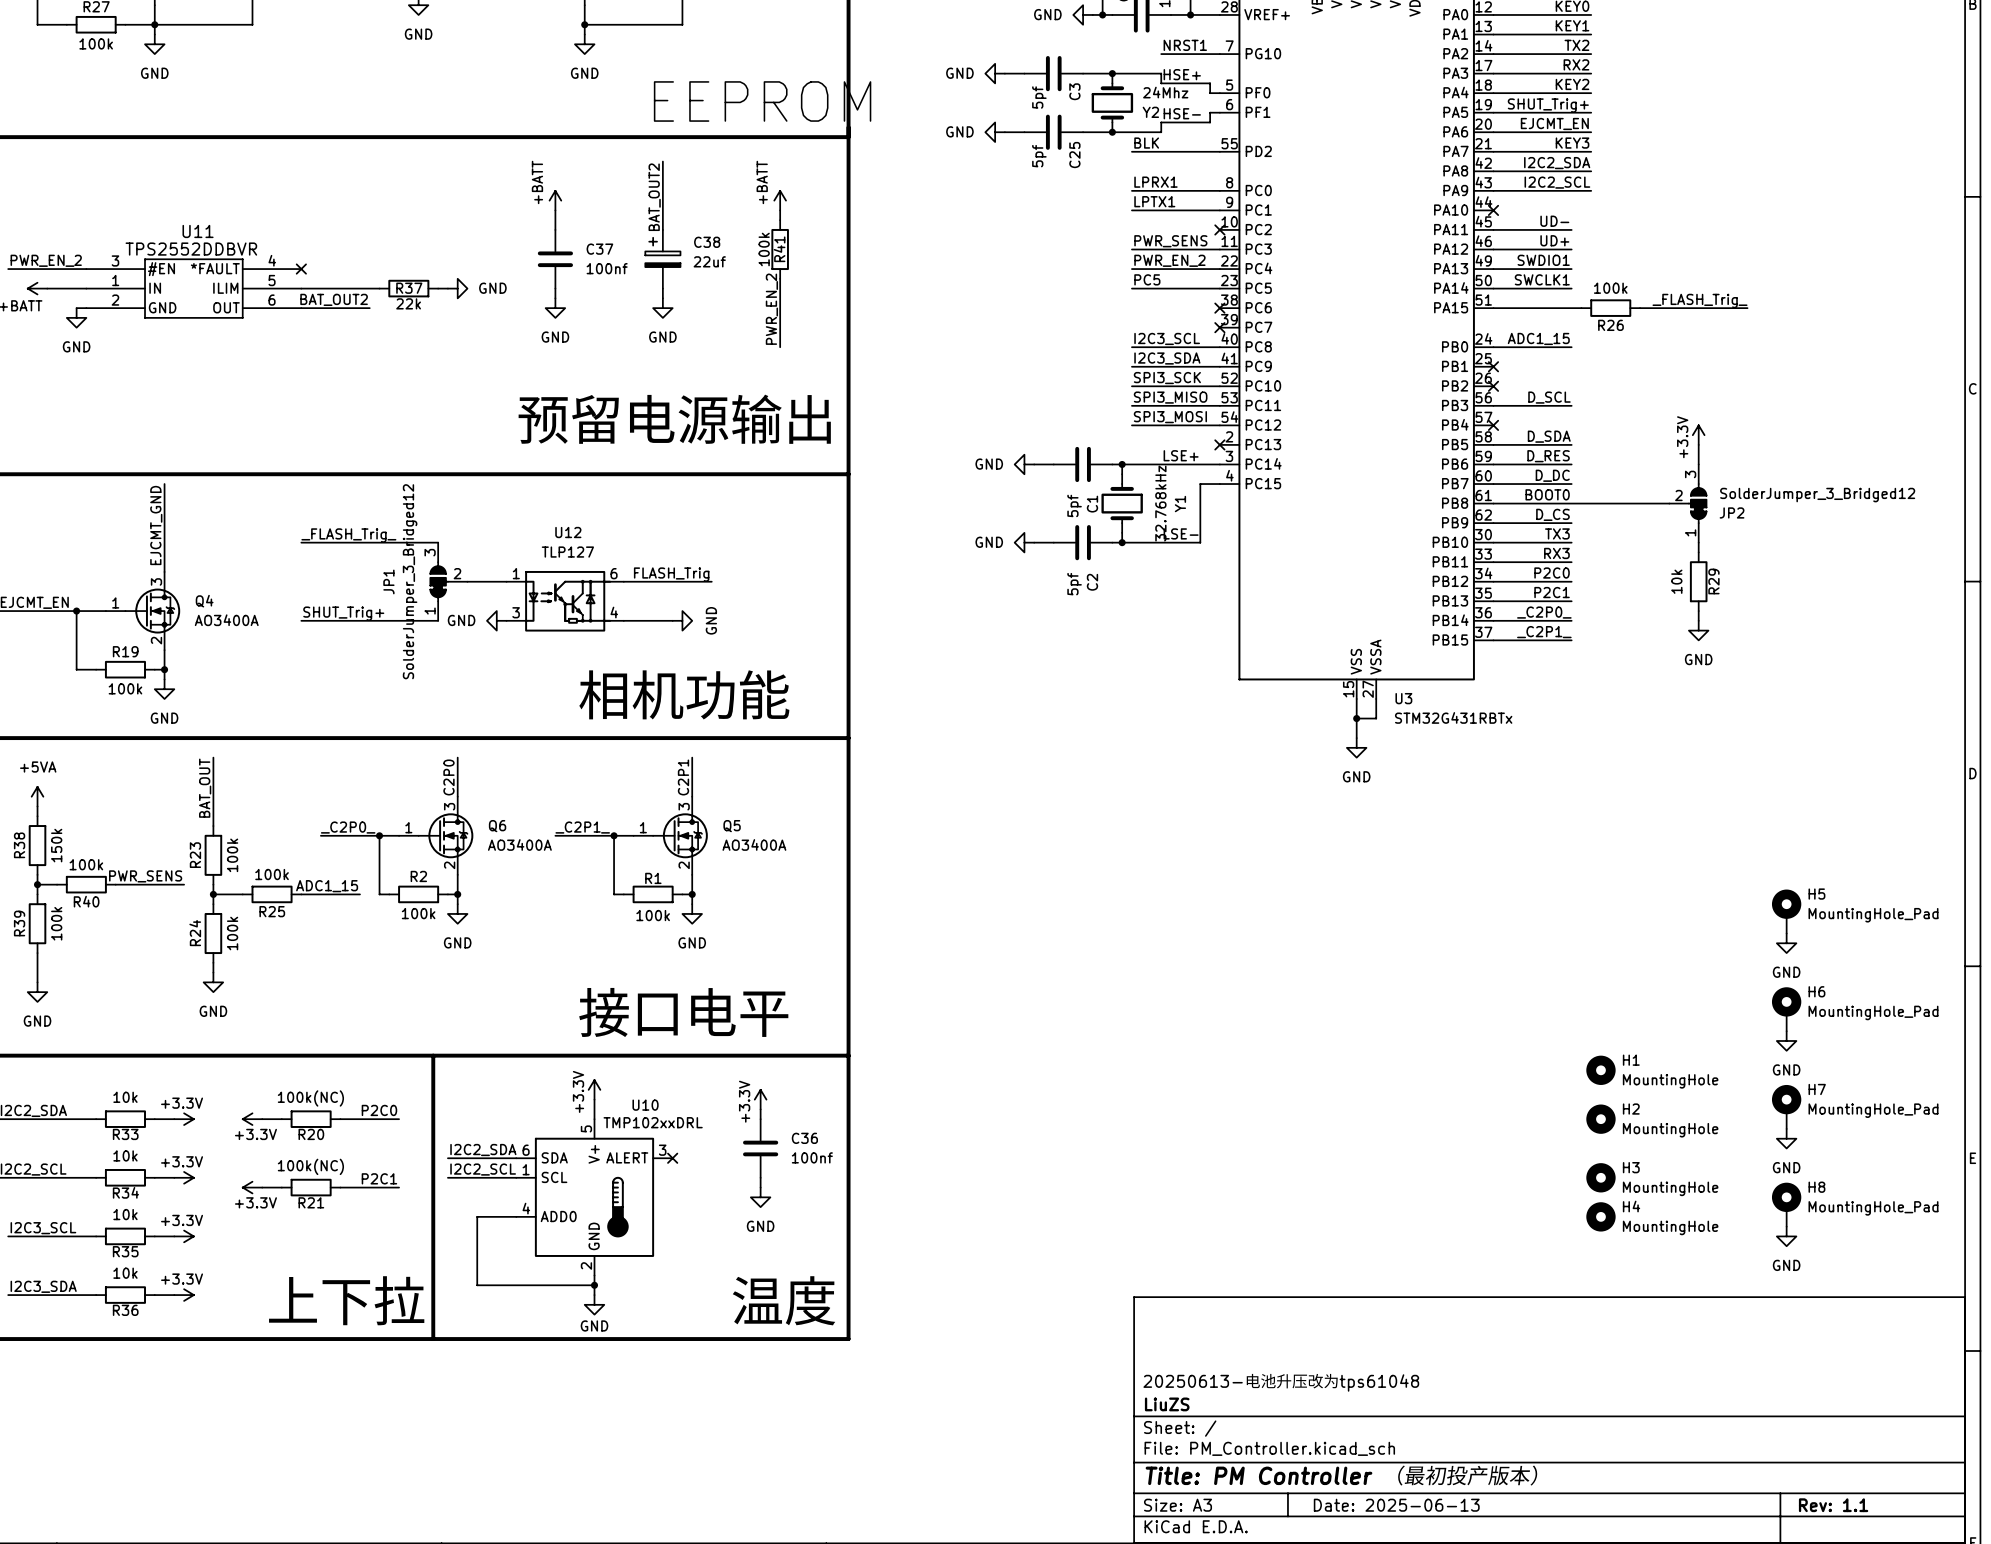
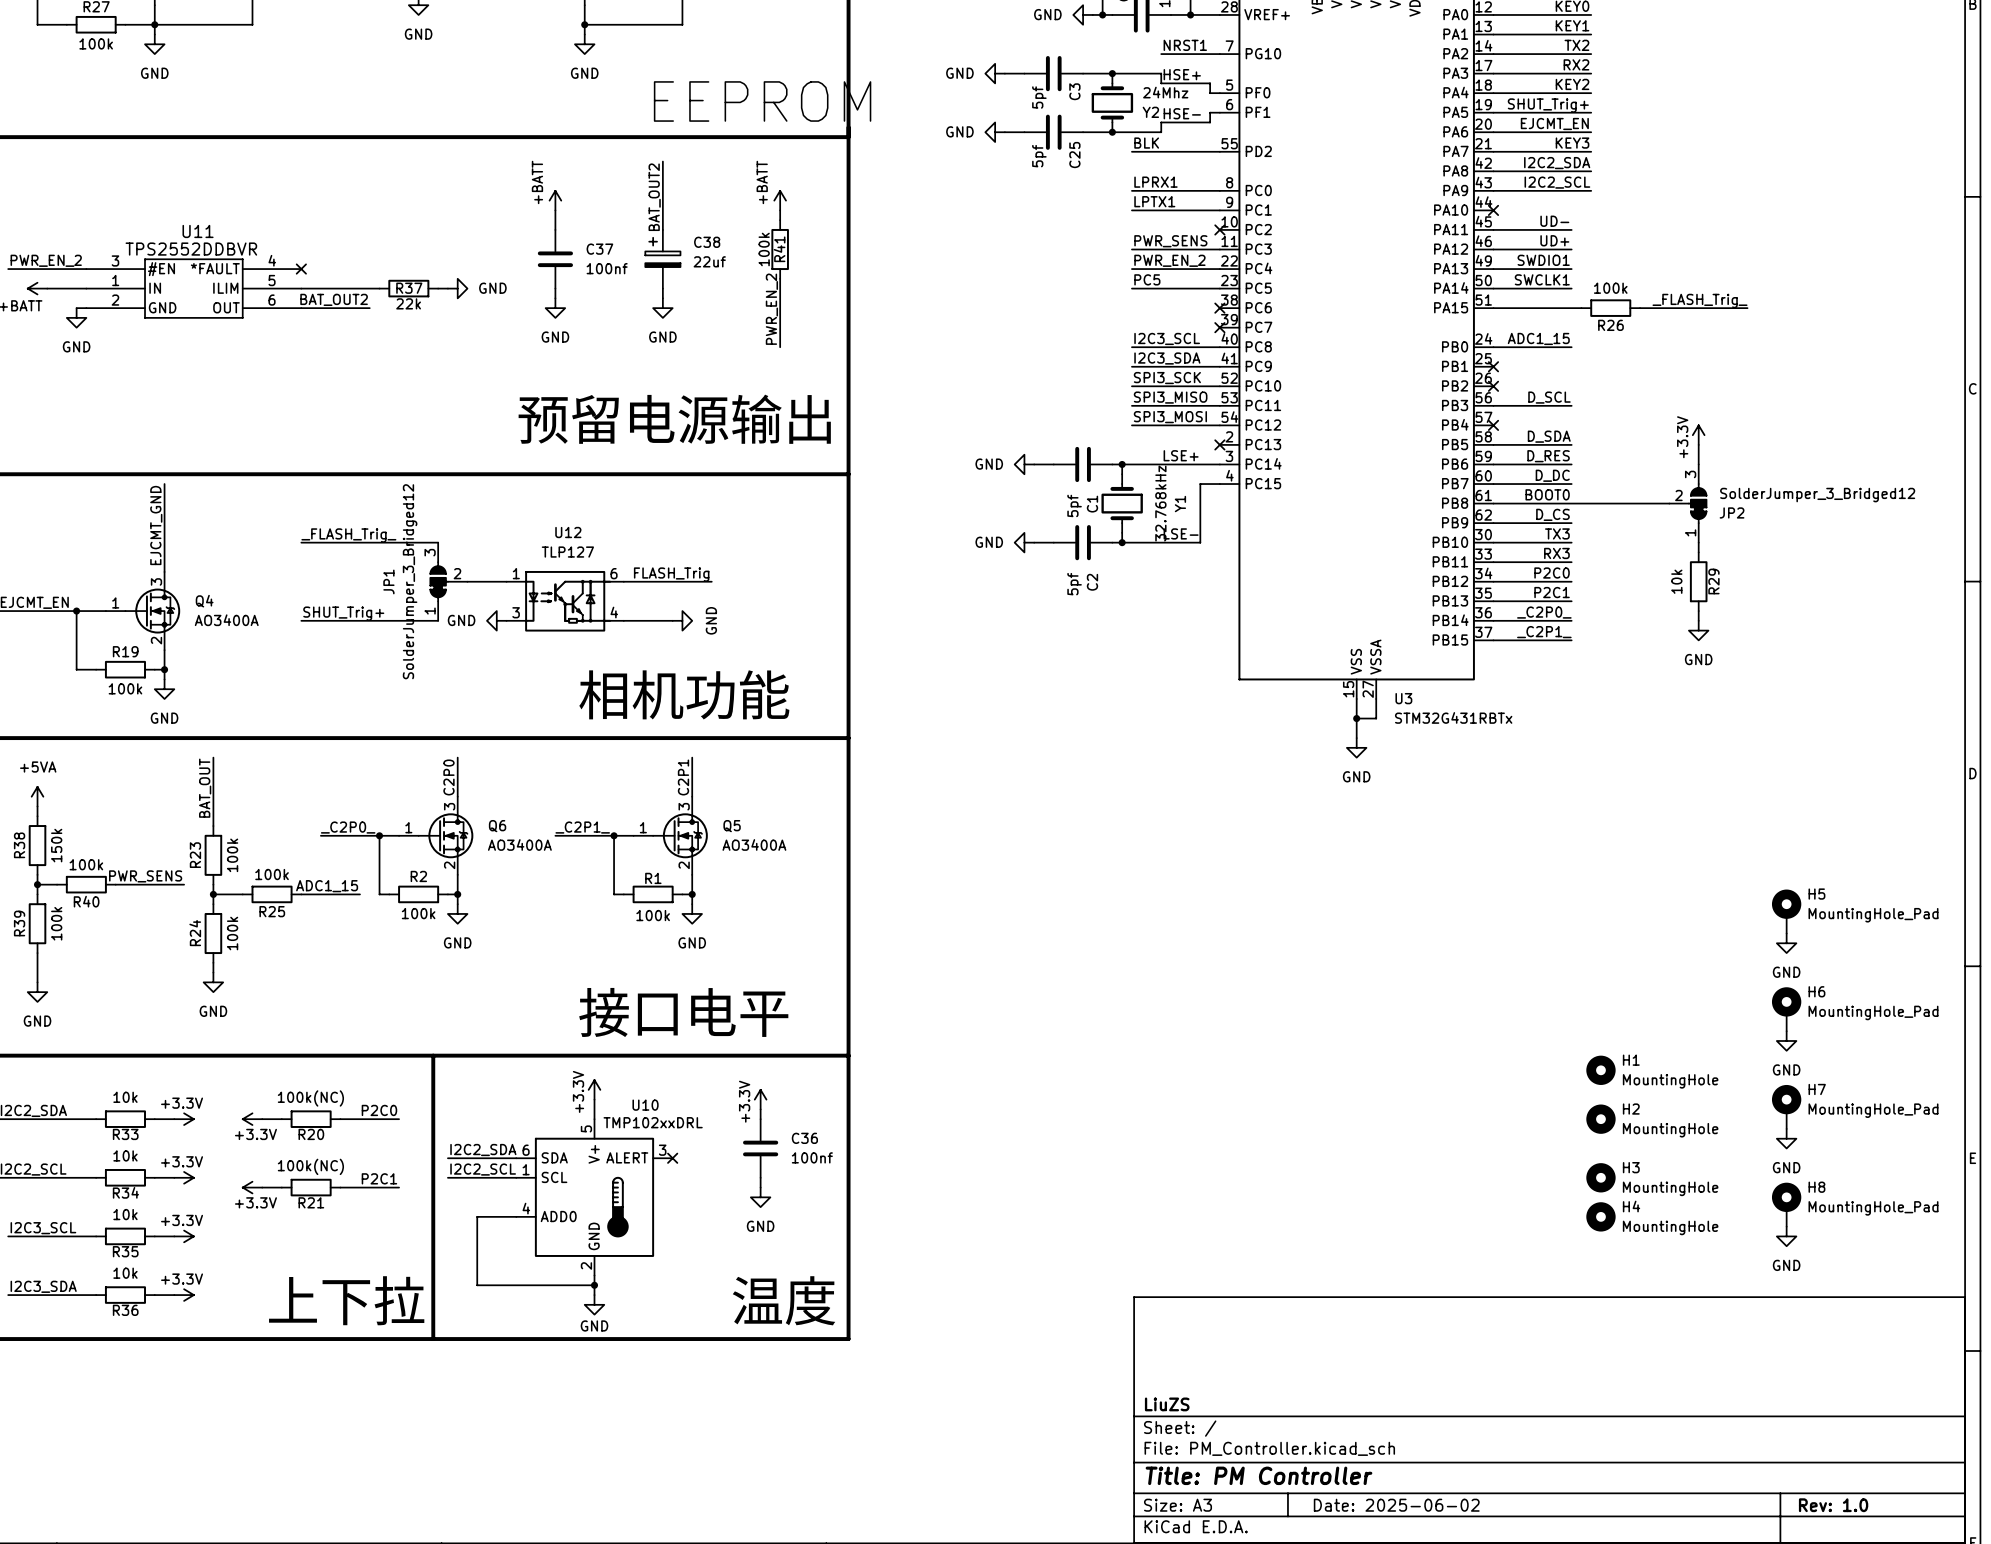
title block: 20250613-电池升压改为tps61048 (1281, 1382) -> none
title block: Title: PM Controller （最初投产版本） (1342, 1475) -> Title: PM Controller (1258, 1475)
title block: Date: 2025-06-13 (1396, 1505) -> Date: 2025-06-02 (1396, 1505)
title block: Rev: 1.1 (1833, 1505) -> Rev: 1.0 (1833, 1505)

